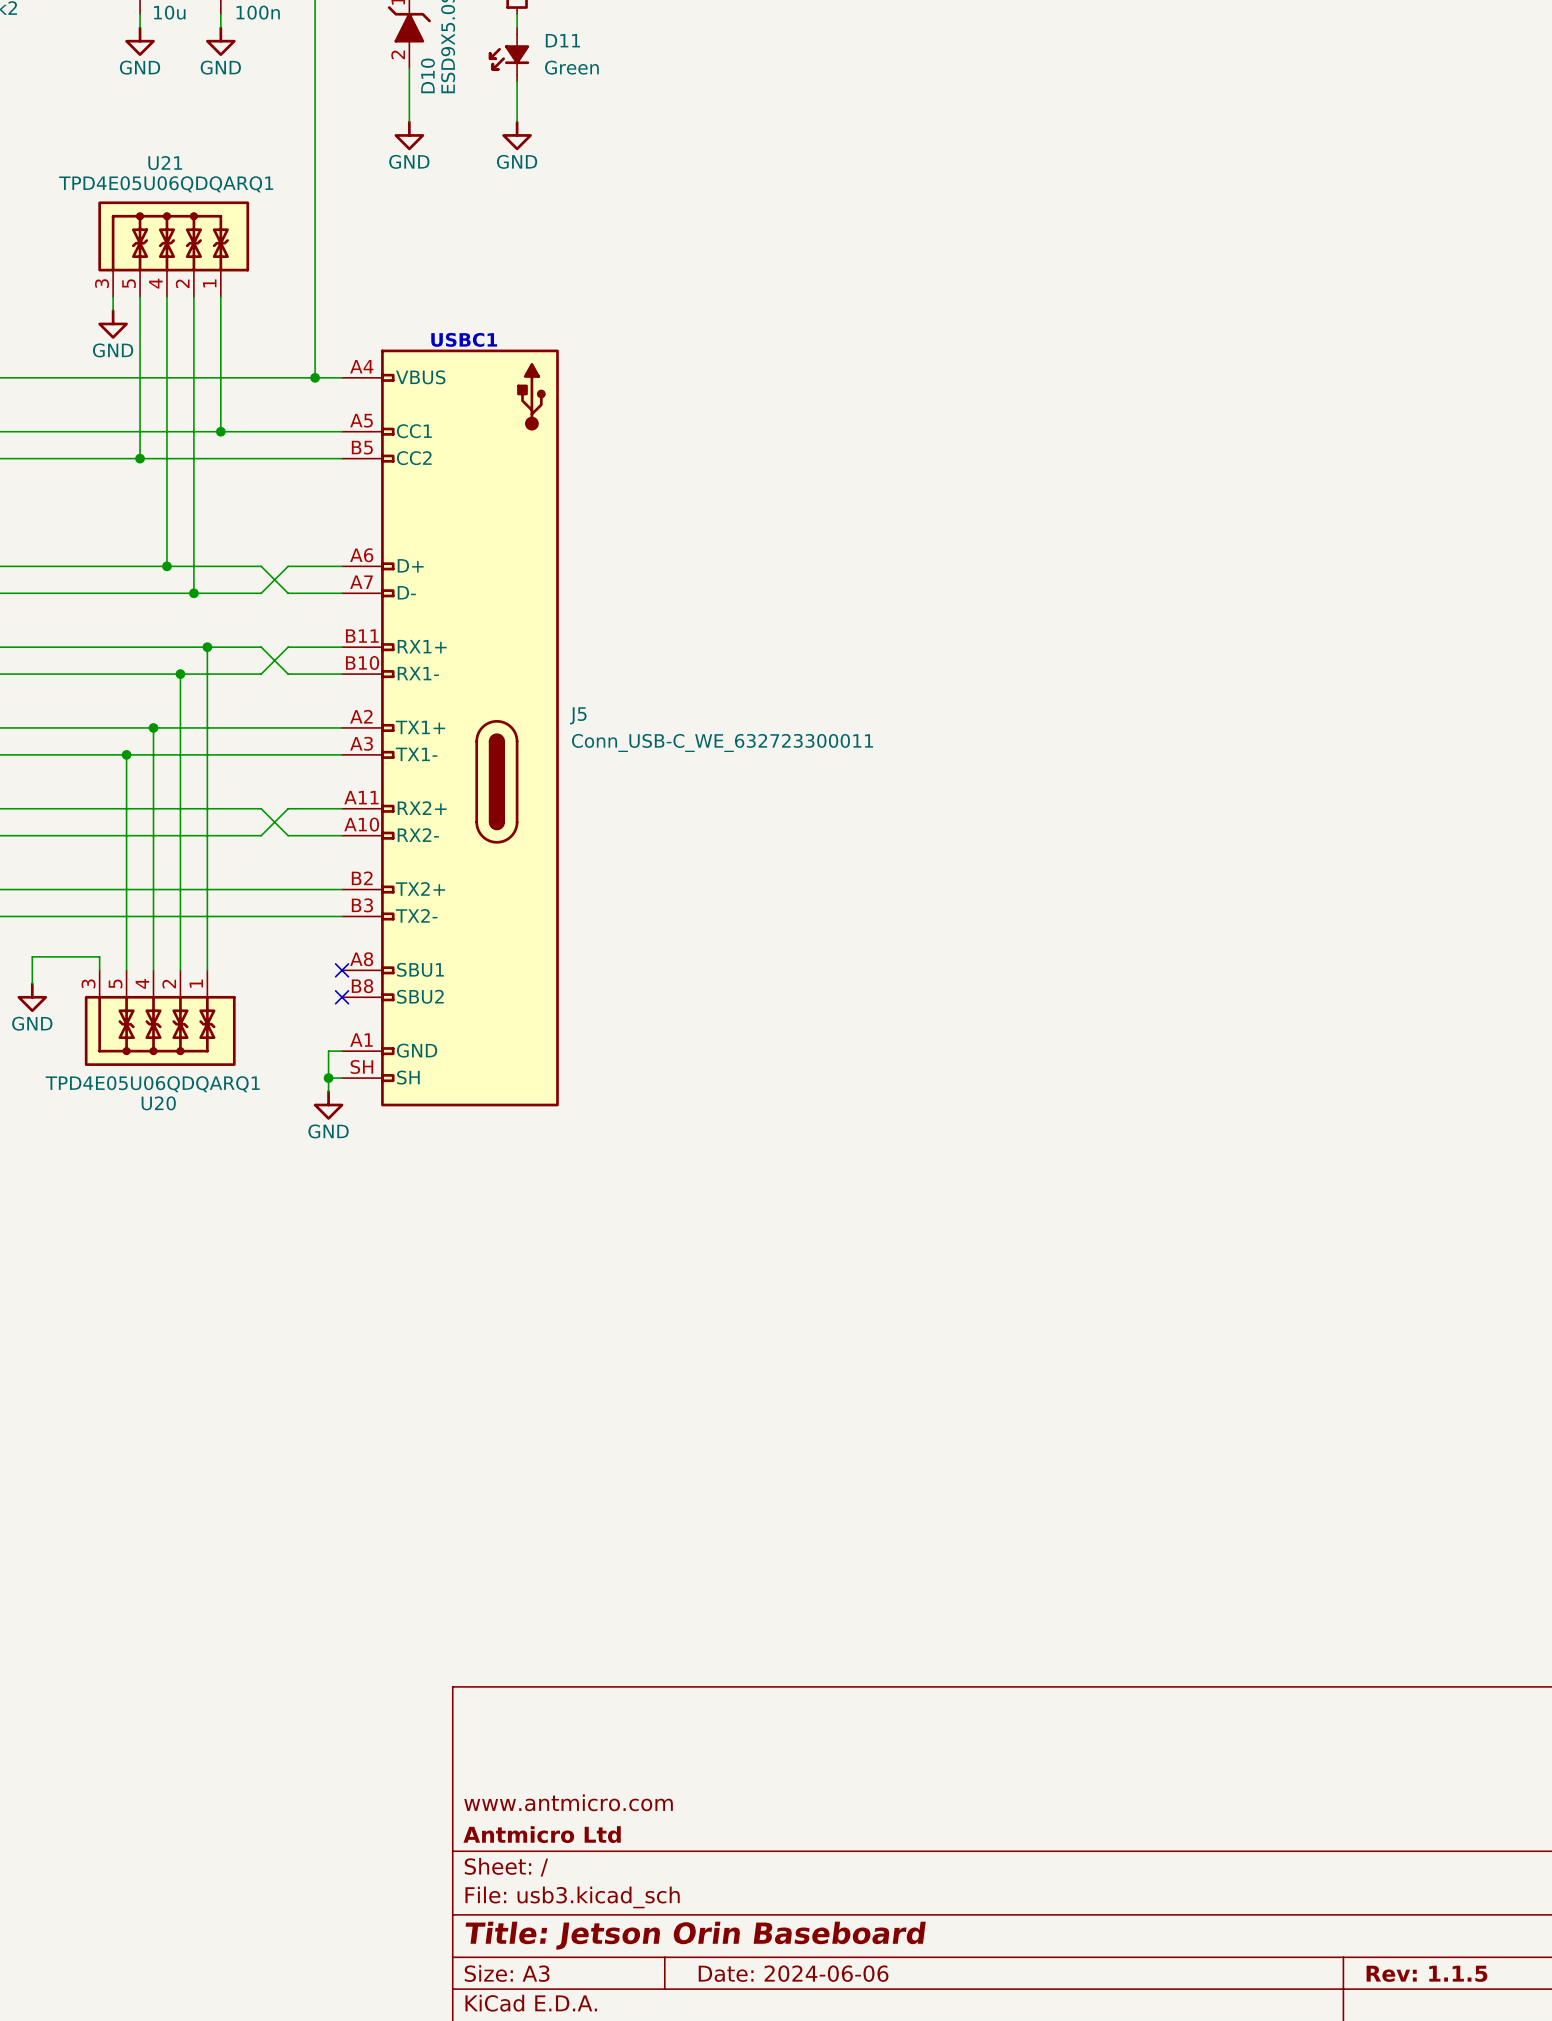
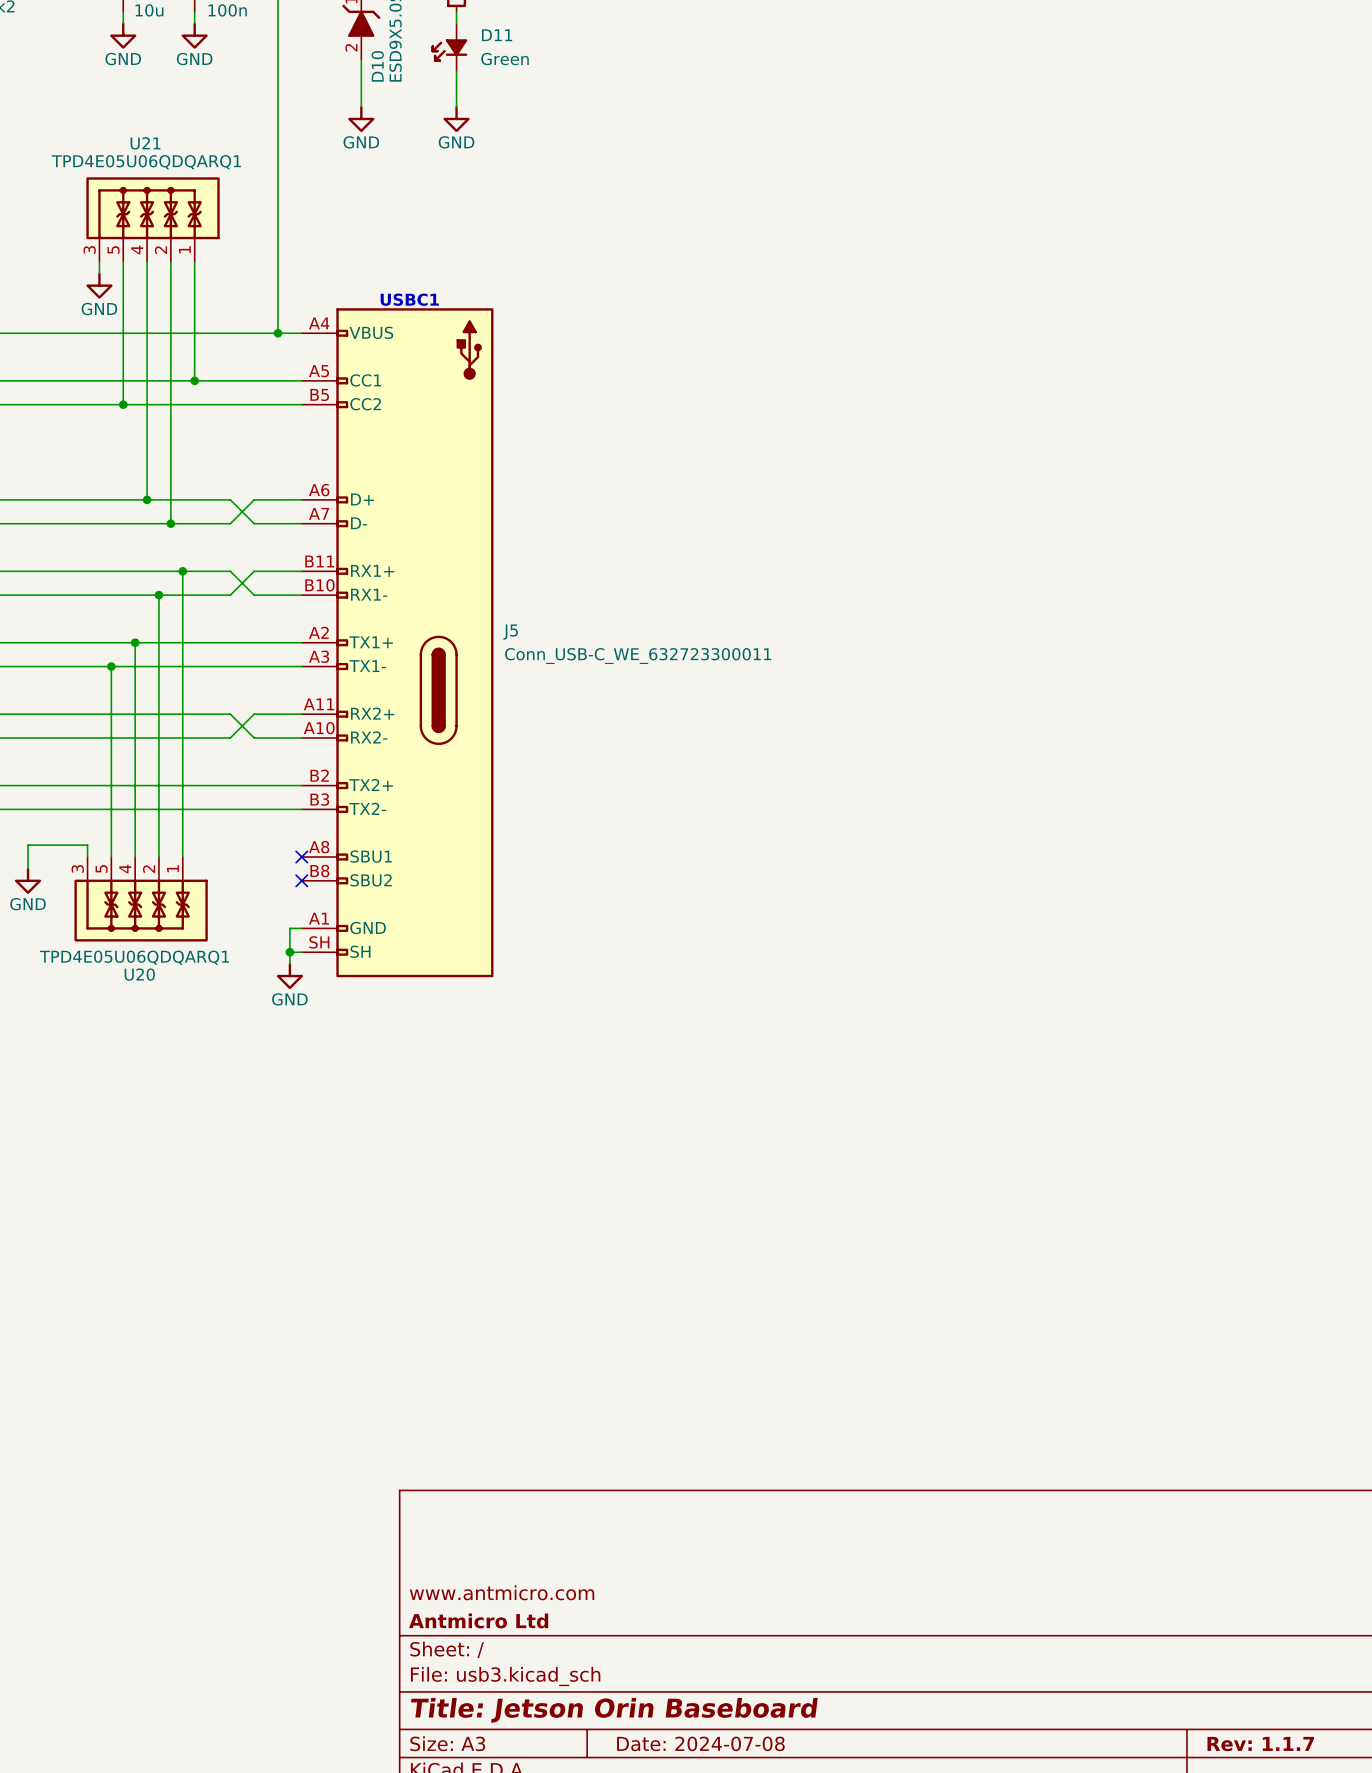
title block: Date: 2024-06-06 (793, 1973) -> Date: 2024-07-08 (700, 1743)
title block: Rev: 1.1.5 (1426, 1973) -> Rev: 1.1.7 (1260, 1744)

